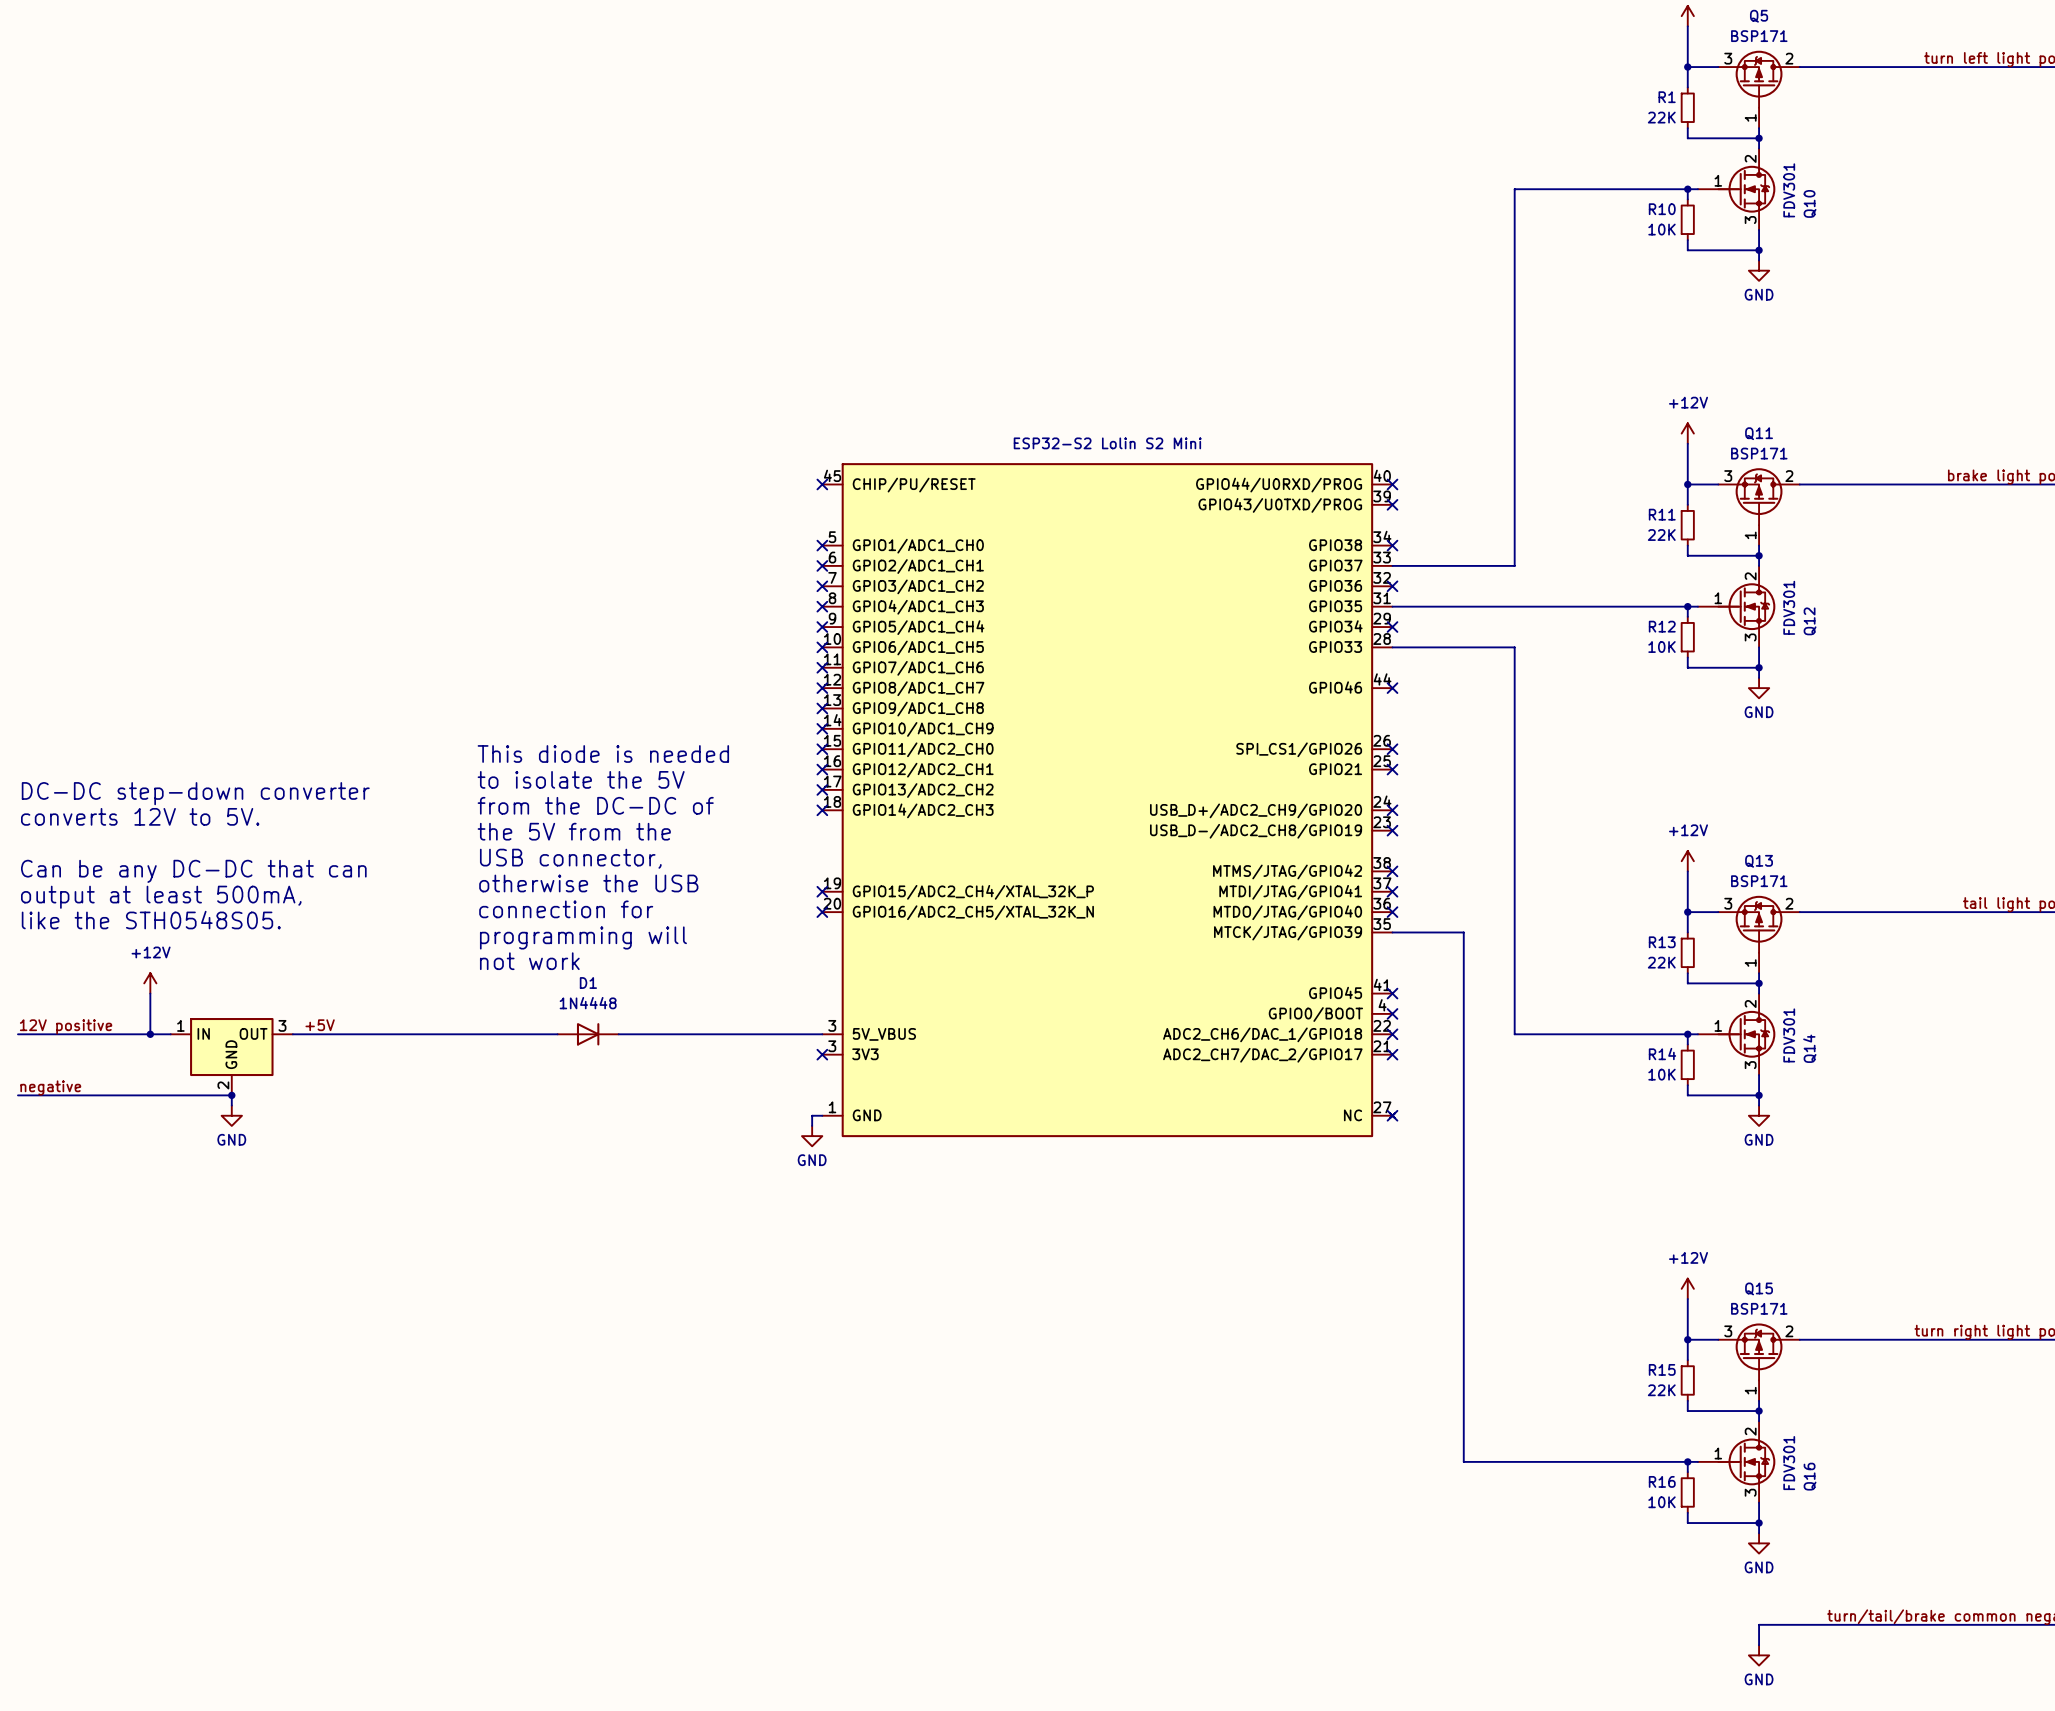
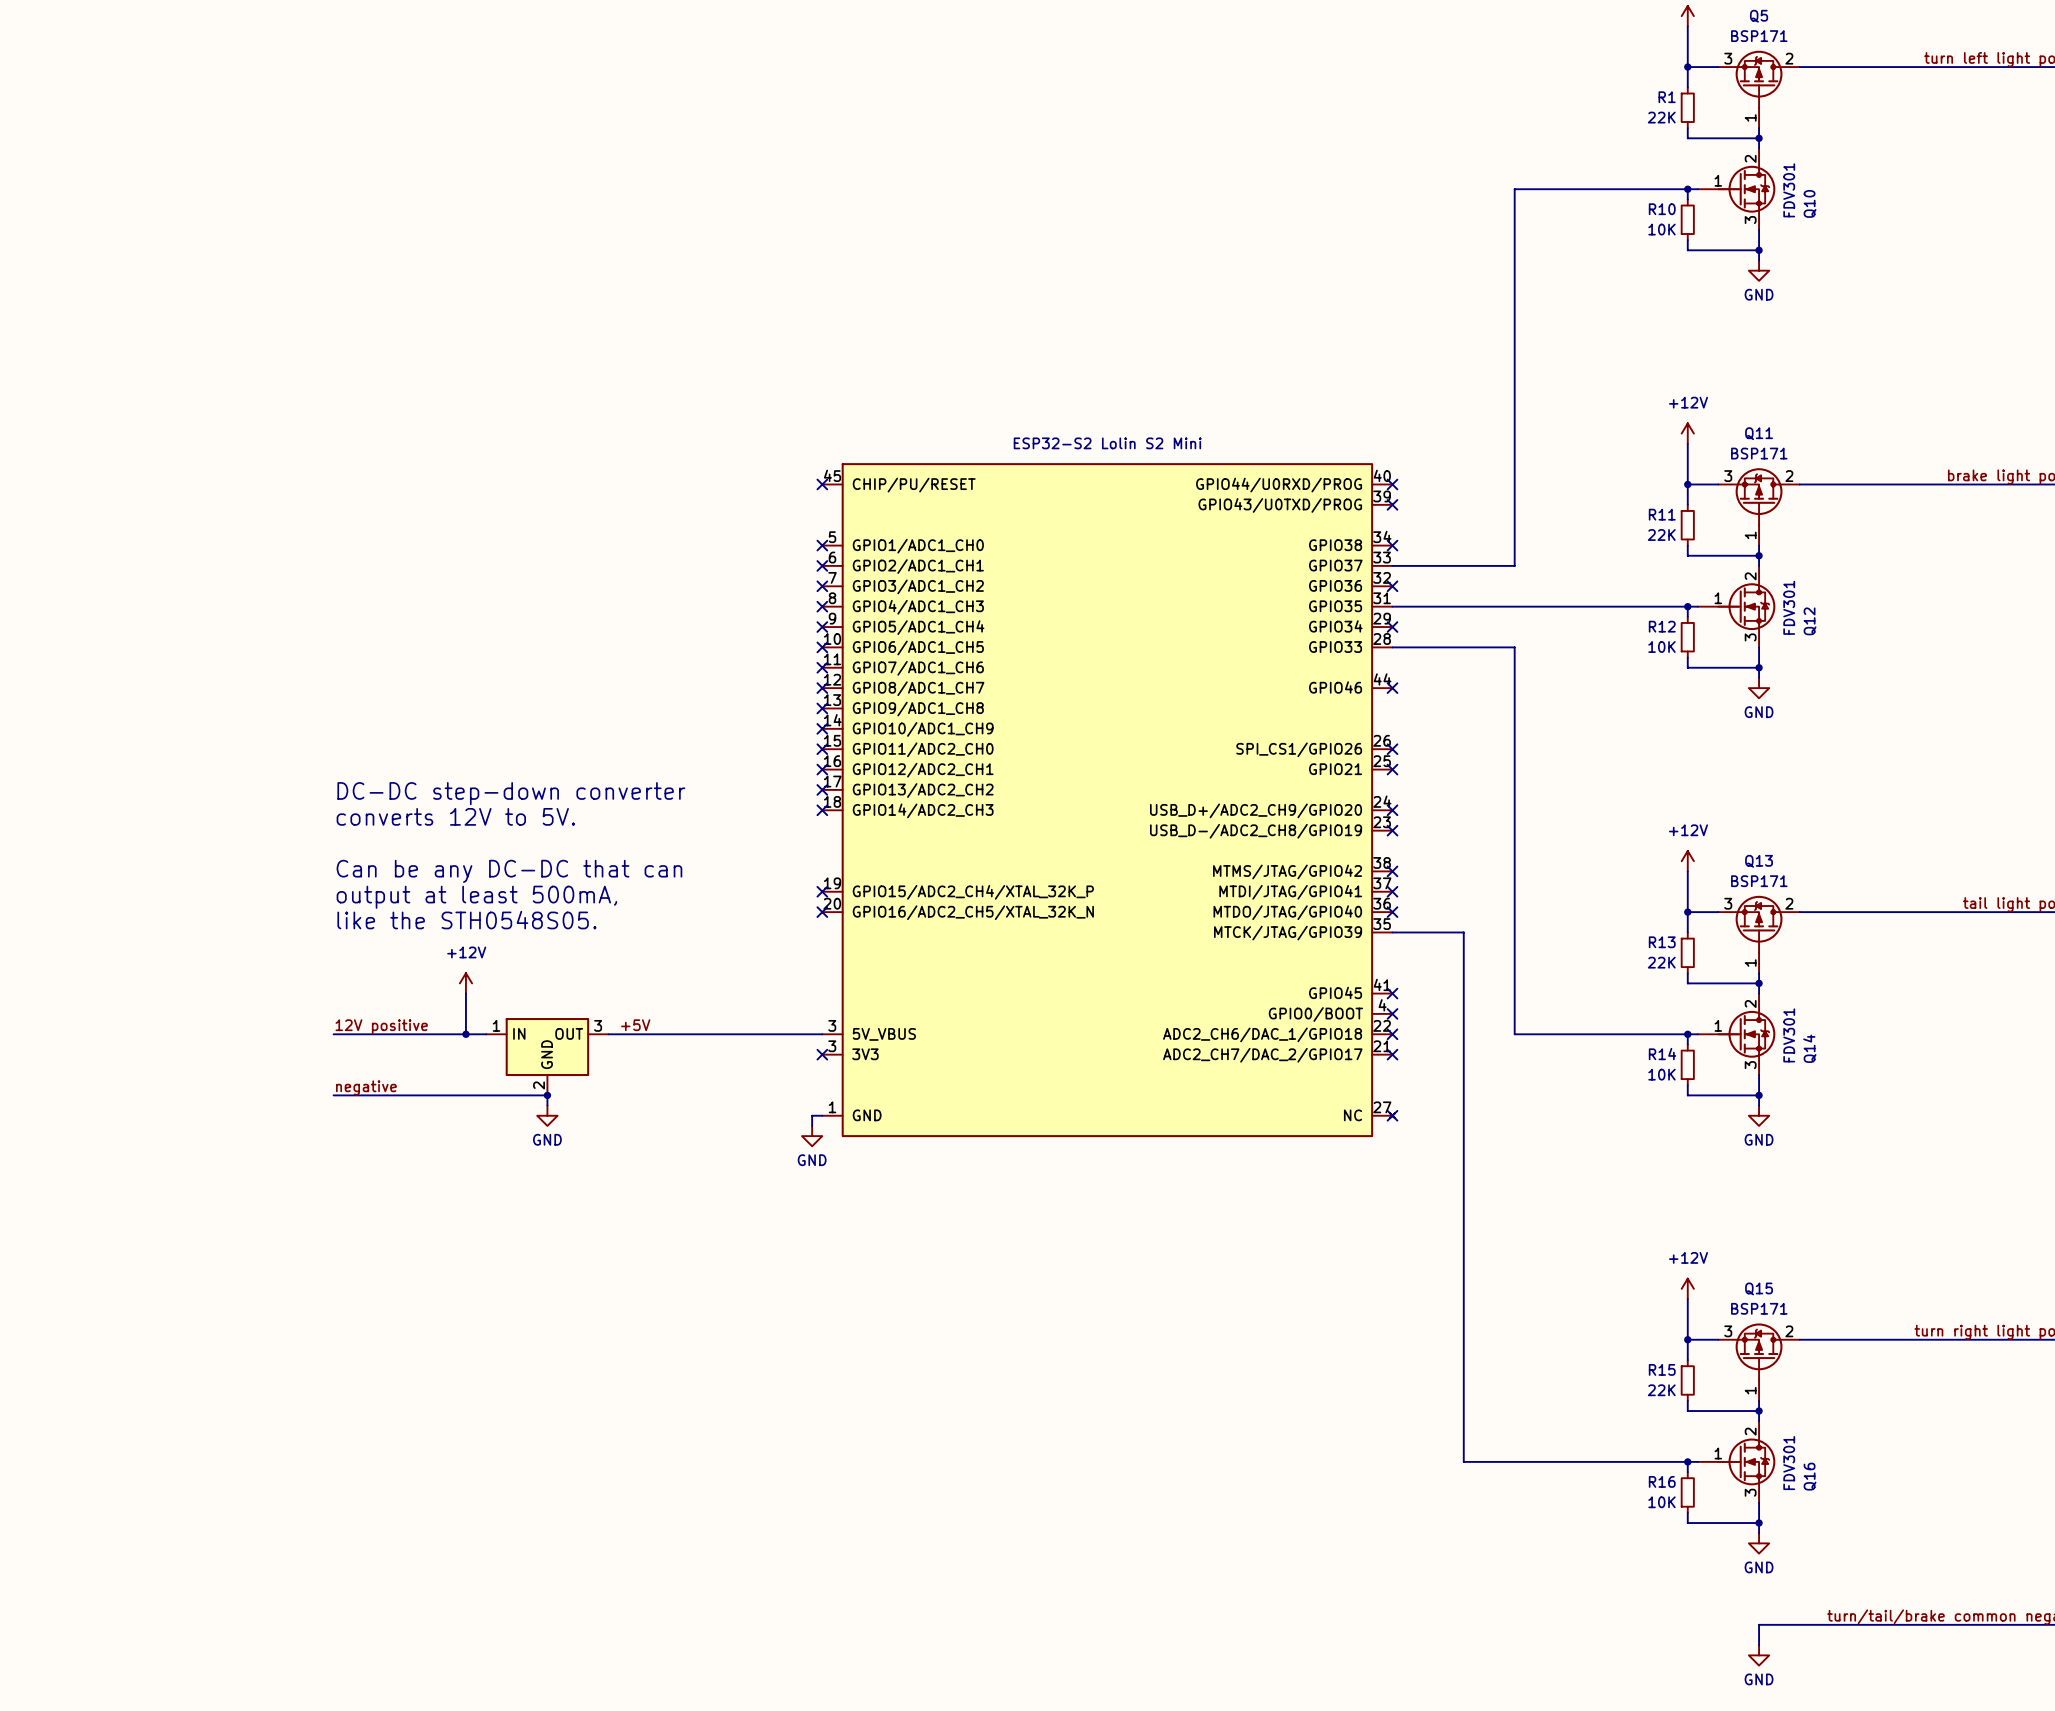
text: This diode is needed (603, 753) -> none
text: to isolate the 5V (581, 779) -> none
text: DC-DC step-down converter (195, 793) -> none
text: none -> DC-DC step-down converter (511, 793)
text: from the DC-DC of (595, 805) -> none
text: converts 12V to 5V. (140, 816) -> none
text: none -> converts 12V to 5V. (455, 816)
text: the 5V from the (574, 831) -> none
text: USB connector, (570, 858) -> none
text: Can be any DC-DC that can (193, 871) -> none
text: none -> Can be any DC-DC that can (509, 871)
text: otherwise the USB (588, 883) -> none
text: output at least 500mA, (161, 897) -> none
text: none -> output at least 500mA, (476, 897)
text: connection for (566, 909) -> none
text: like the STH0548S05. (151, 920) -> none
text: none -> like the STH0548S05. (466, 920)
text: programming will (583, 937) -> none
text: not work (529, 961) -> none
power symbol: +12V (150, 983) -> none
power symbol: none -> +12V (465, 983)
wire: (150, 993) (150, 1034) -> none
wire: none -> (465, 993) (465, 1034)
label: +5V (320, 1025) -> none
label: none -> +5V (635, 1025)
label: 12V positive (66, 1026) -> none
label: none -> 12V positive (381, 1026)
wire: (17, 1034) (170, 1034) -> none
junction: (150, 1034) -> none
wire: (292, 1034) (333, 1034) -> none
junction: none -> (465, 1034)
D1: 1N4448 (588, 1034) -> none
part: (231, 1056) -> none
part: none -> (547, 1056)
label: negative (50, 1088) -> none
label: none -> negative (366, 1088)
wire: (17, 1095) (231, 1095) (231, 1105) -> none
junction: (231, 1095) -> none
wire: none -> (333, 1095) (547, 1095) (547, 1105)
junction: none -> (547, 1095)
power symbol: GND (231, 1115) -> none
power symbol: none -> GND (547, 1115)

